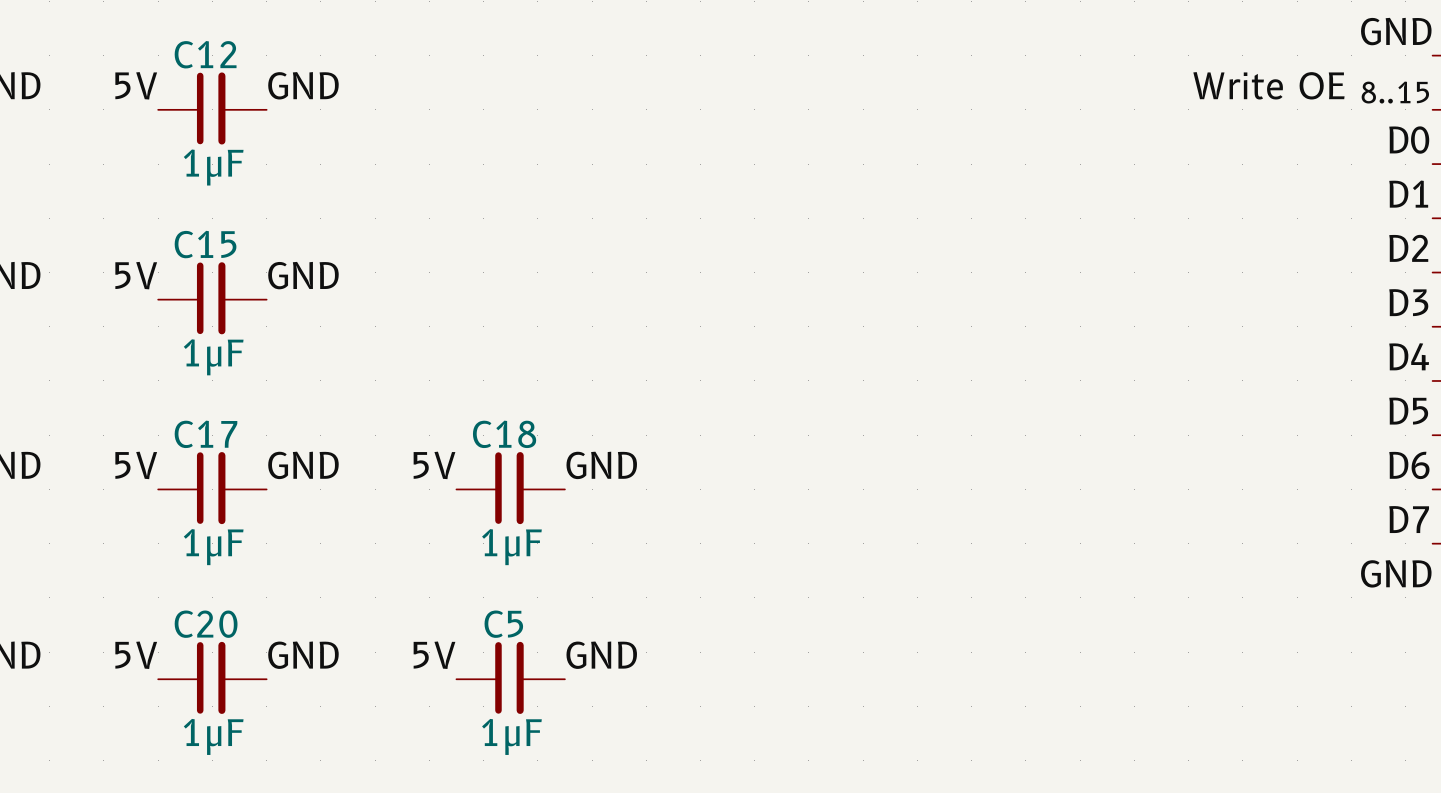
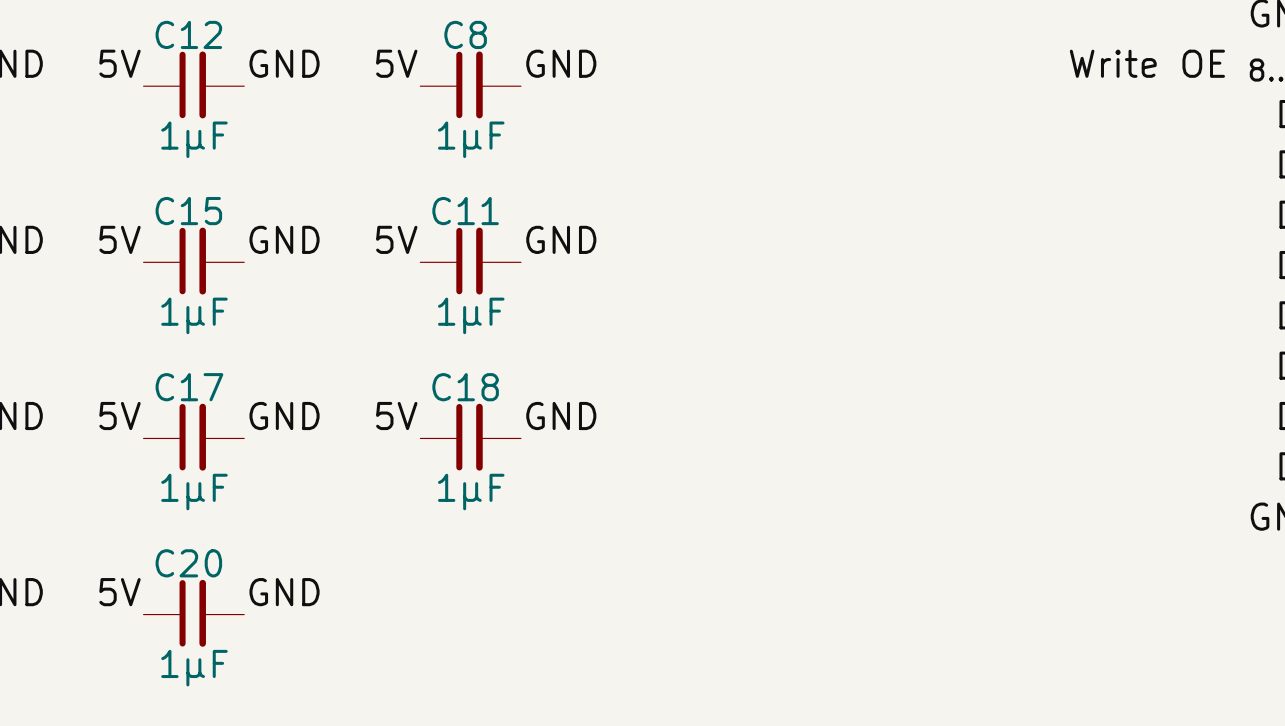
label: none -> 5V (396, 63)
label: none -> GND (561, 63)
C8: none -> 1μF (470, 84)
label: none -> 5V (396, 239)
label: none -> GND (561, 239)
C11: none -> 1μF (470, 261)
label: 5V (434, 655) -> none
label: GND (601, 655) -> none
C5: 1μF (510, 677) -> none

